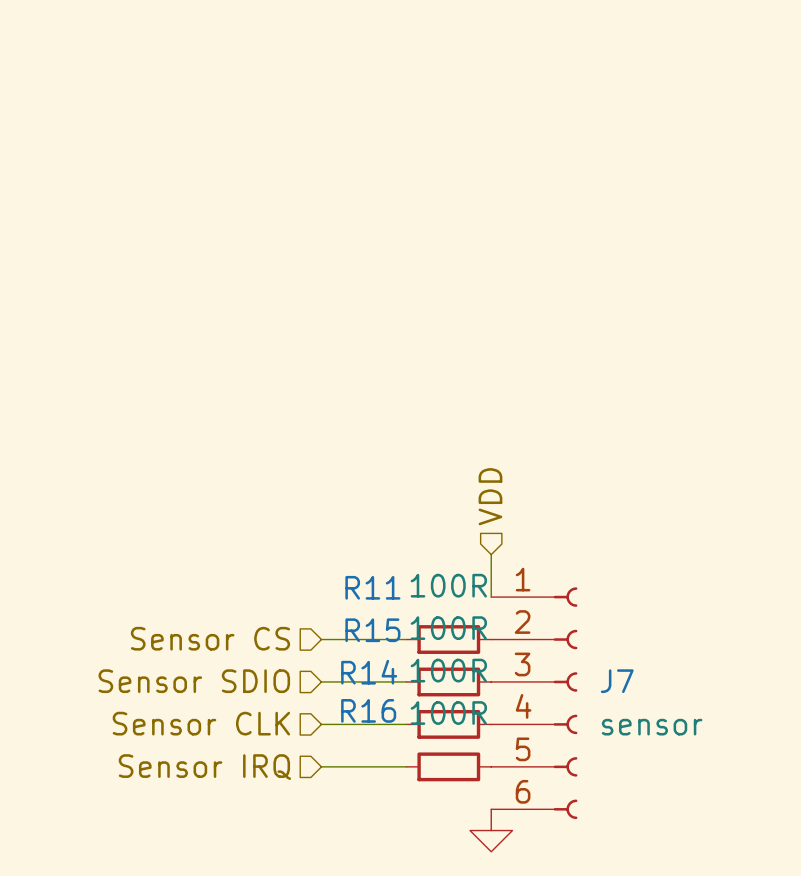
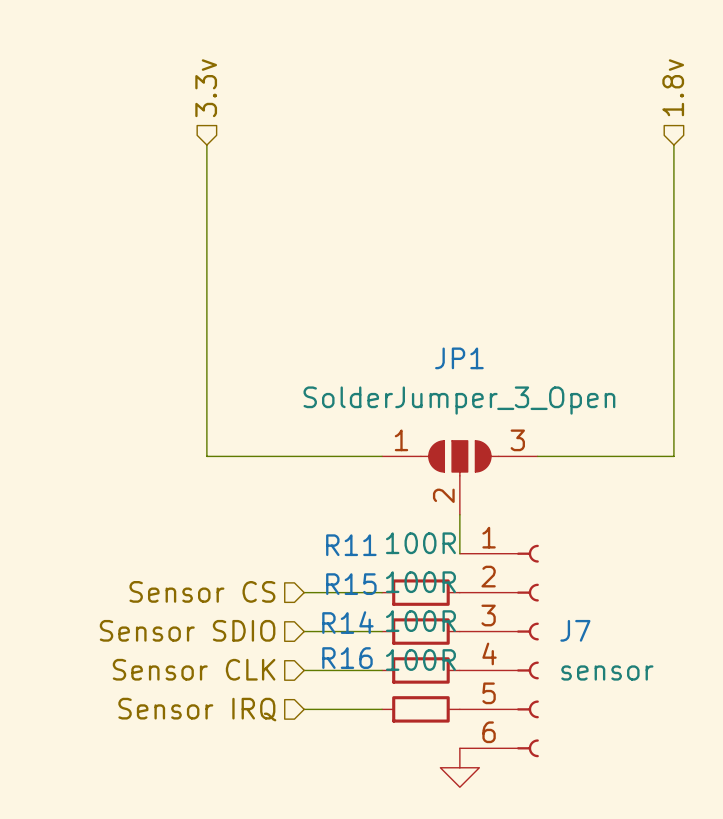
hierarchical label: none -> 1.8v (673, 87)
hierarchical label: none -> 3.3v (206, 88)
wire: none -> (206, 145) (206, 456) (382, 456)
wire: none -> (673, 145) (673, 456) (537, 456)
hierarchical label: VDD (490, 496) -> none
JP1: none -> SolderJumper_3_Open (459, 477)

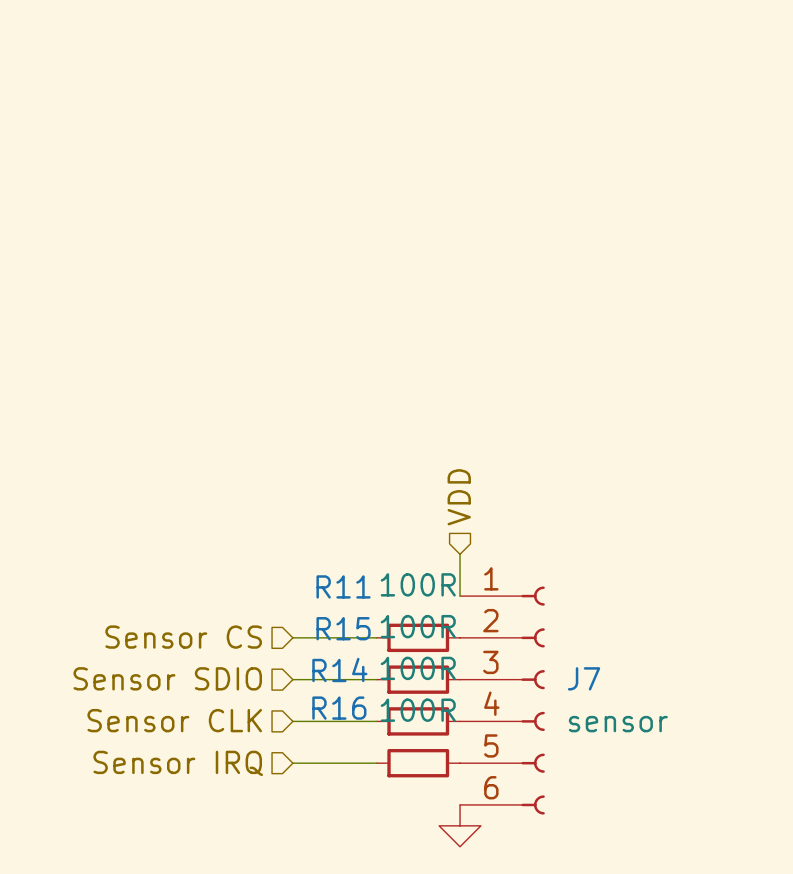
hierarchical label: 1.8v (673, 87) -> none
hierarchical label: 3.3v (206, 88) -> none
wire: (206, 145) (206, 456) (382, 456) -> none
wire: (673, 145) (673, 456) (537, 456) -> none
hierarchical label: none -> VDD (459, 497)
JP1: SolderJumper_3_Open (459, 477) -> none

